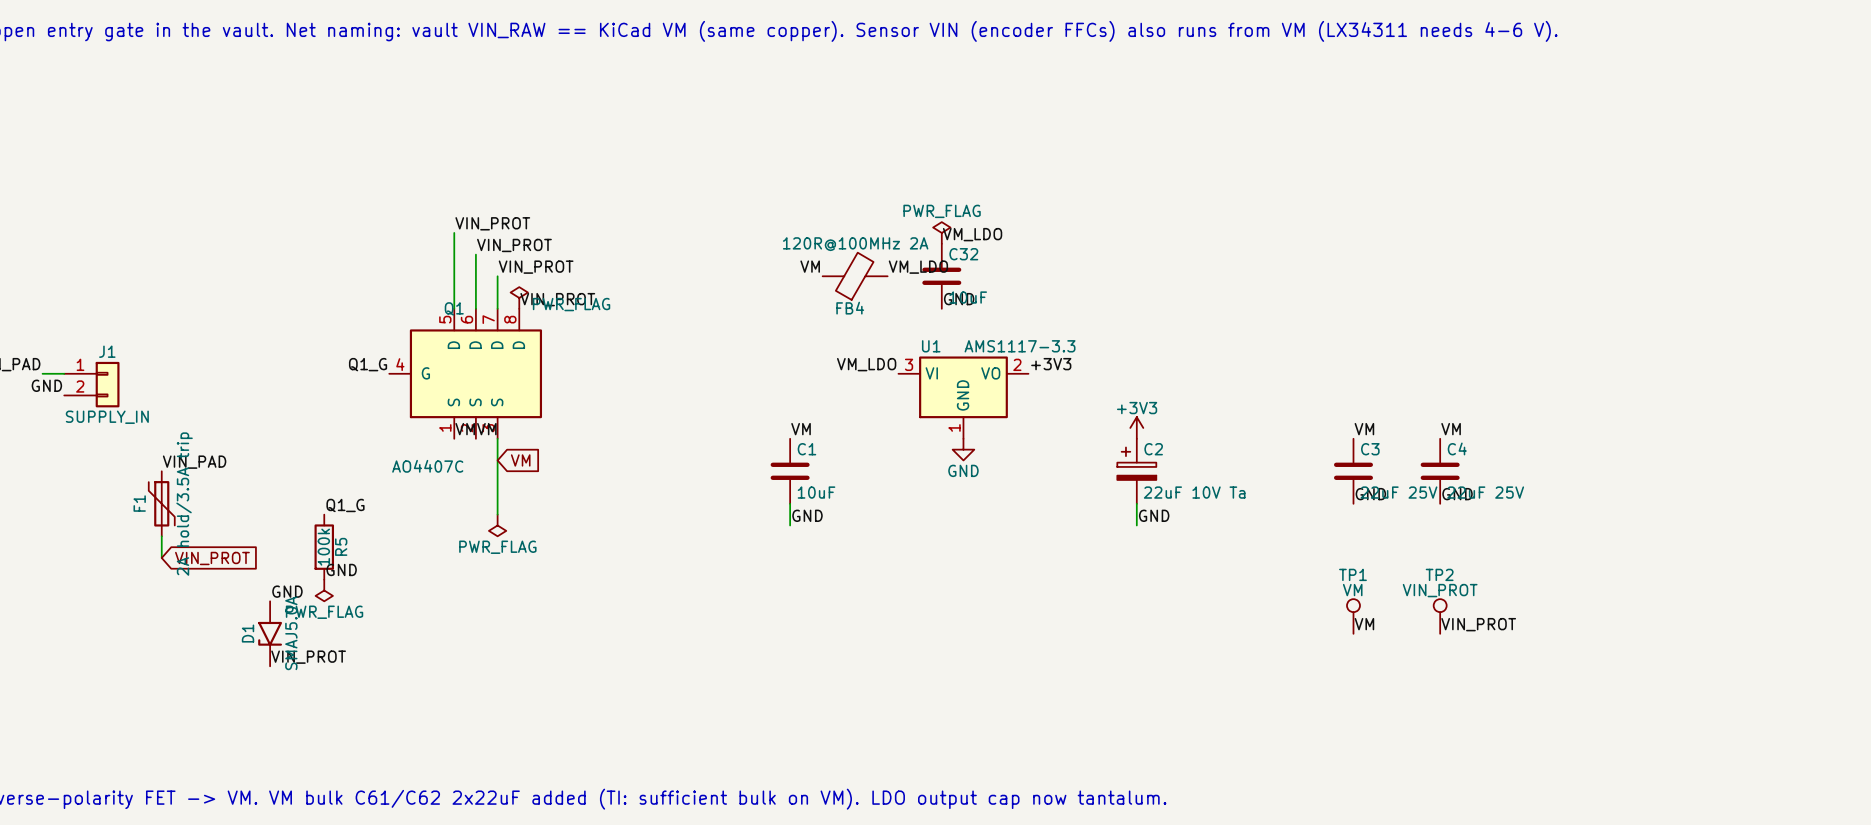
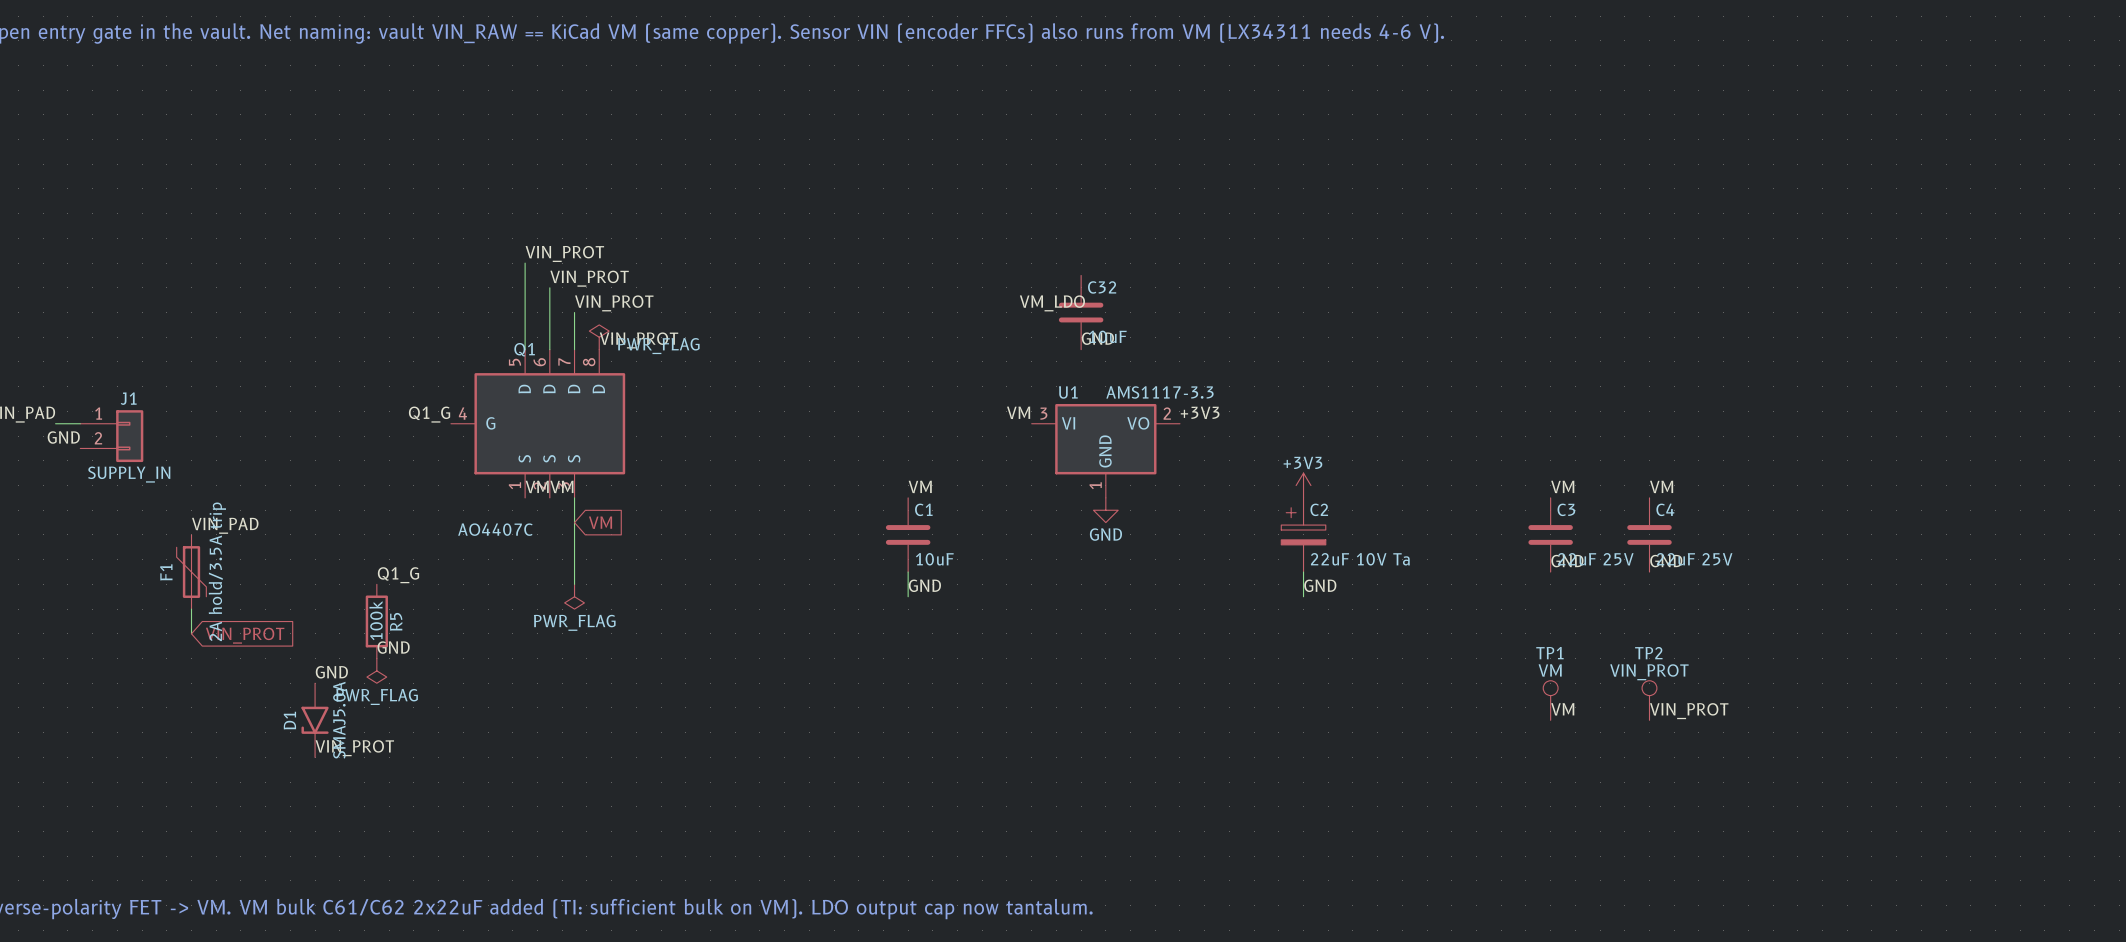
power symbol: PWR_FLAG (941, 232) -> none
label: VM_LDO (972, 234) -> none
label: VM (810, 266) -> none
FB4: 120R@100MHz 2A (855, 276) -> none
label: VM_LDO (866, 364) -> VM (1018, 412)

